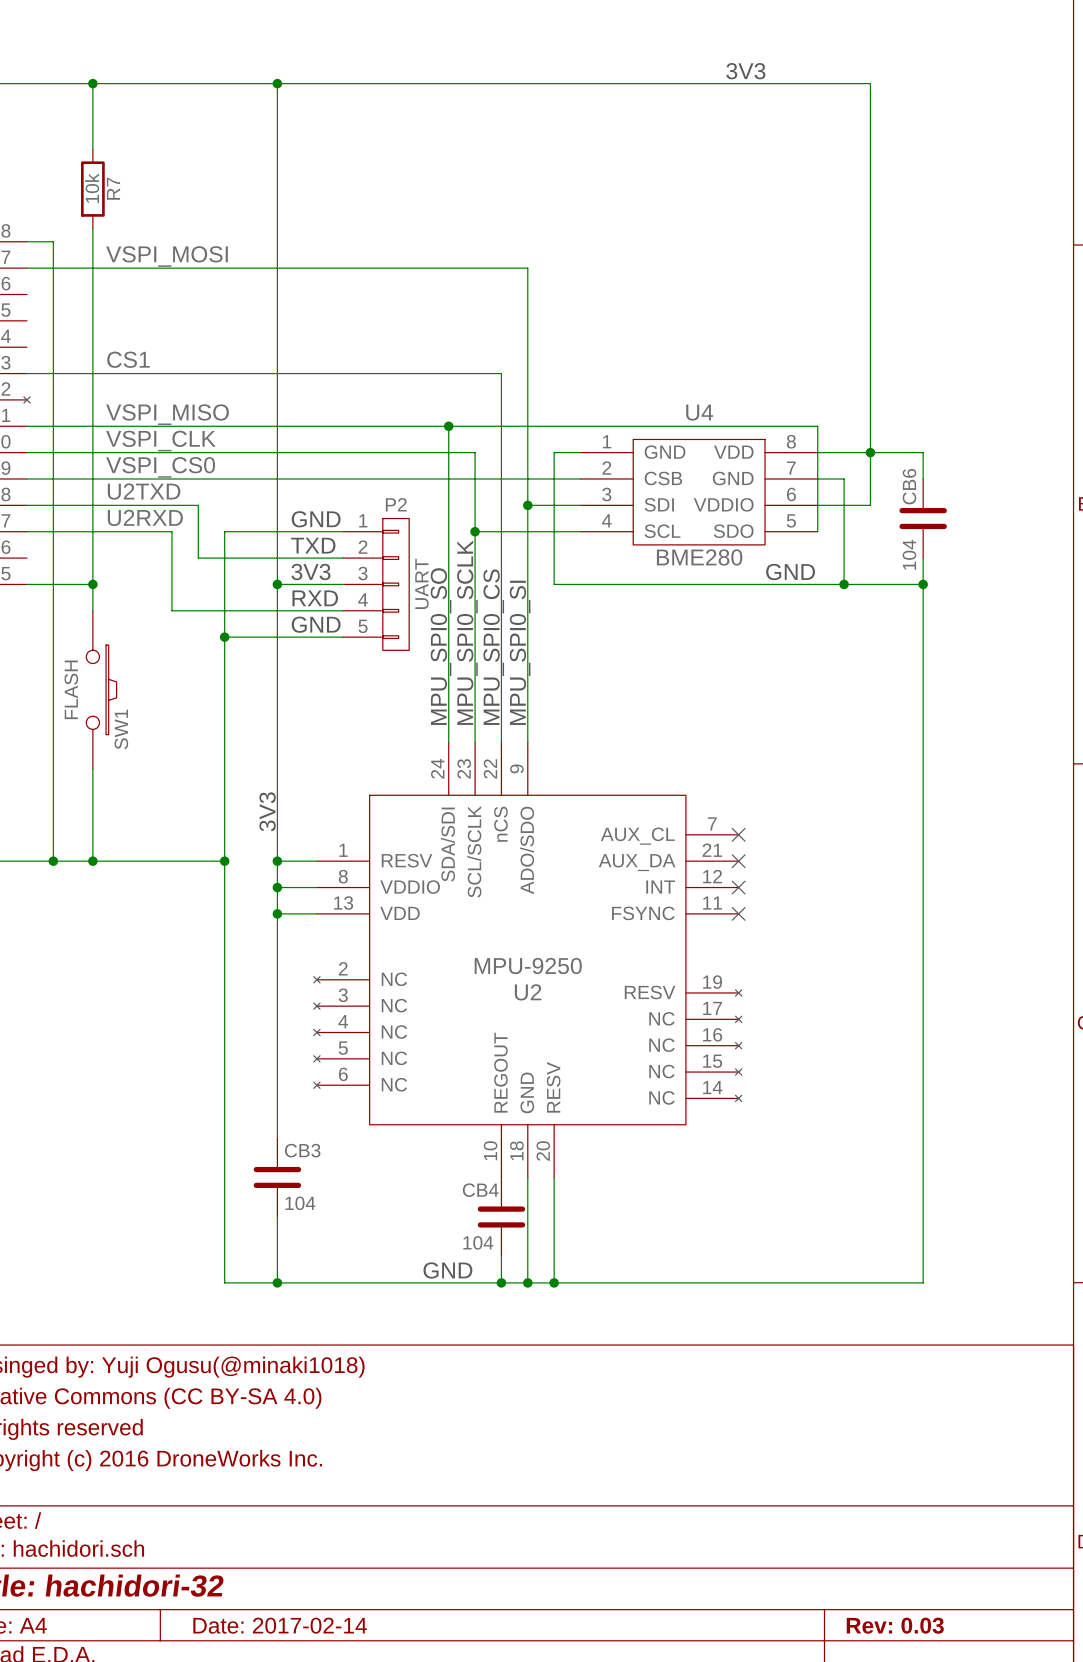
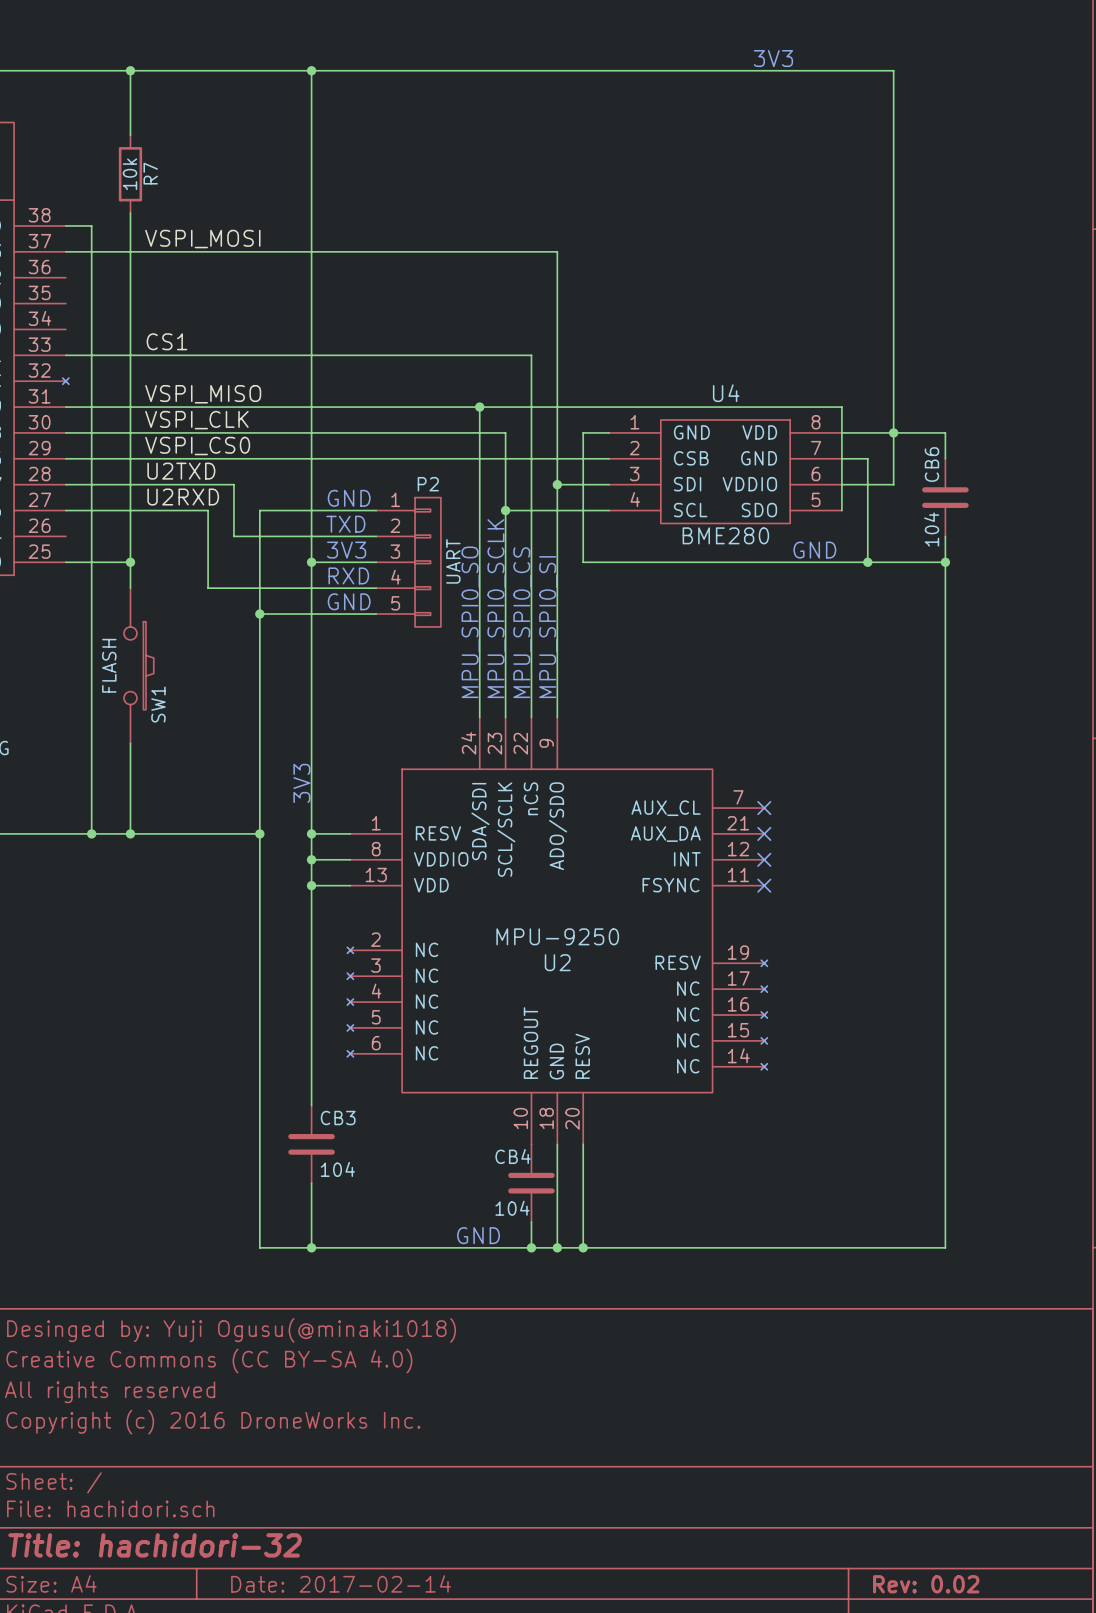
title block: Rev: 0.03 (895, 1625) -> Rev: 0.02 (926, 1584)

